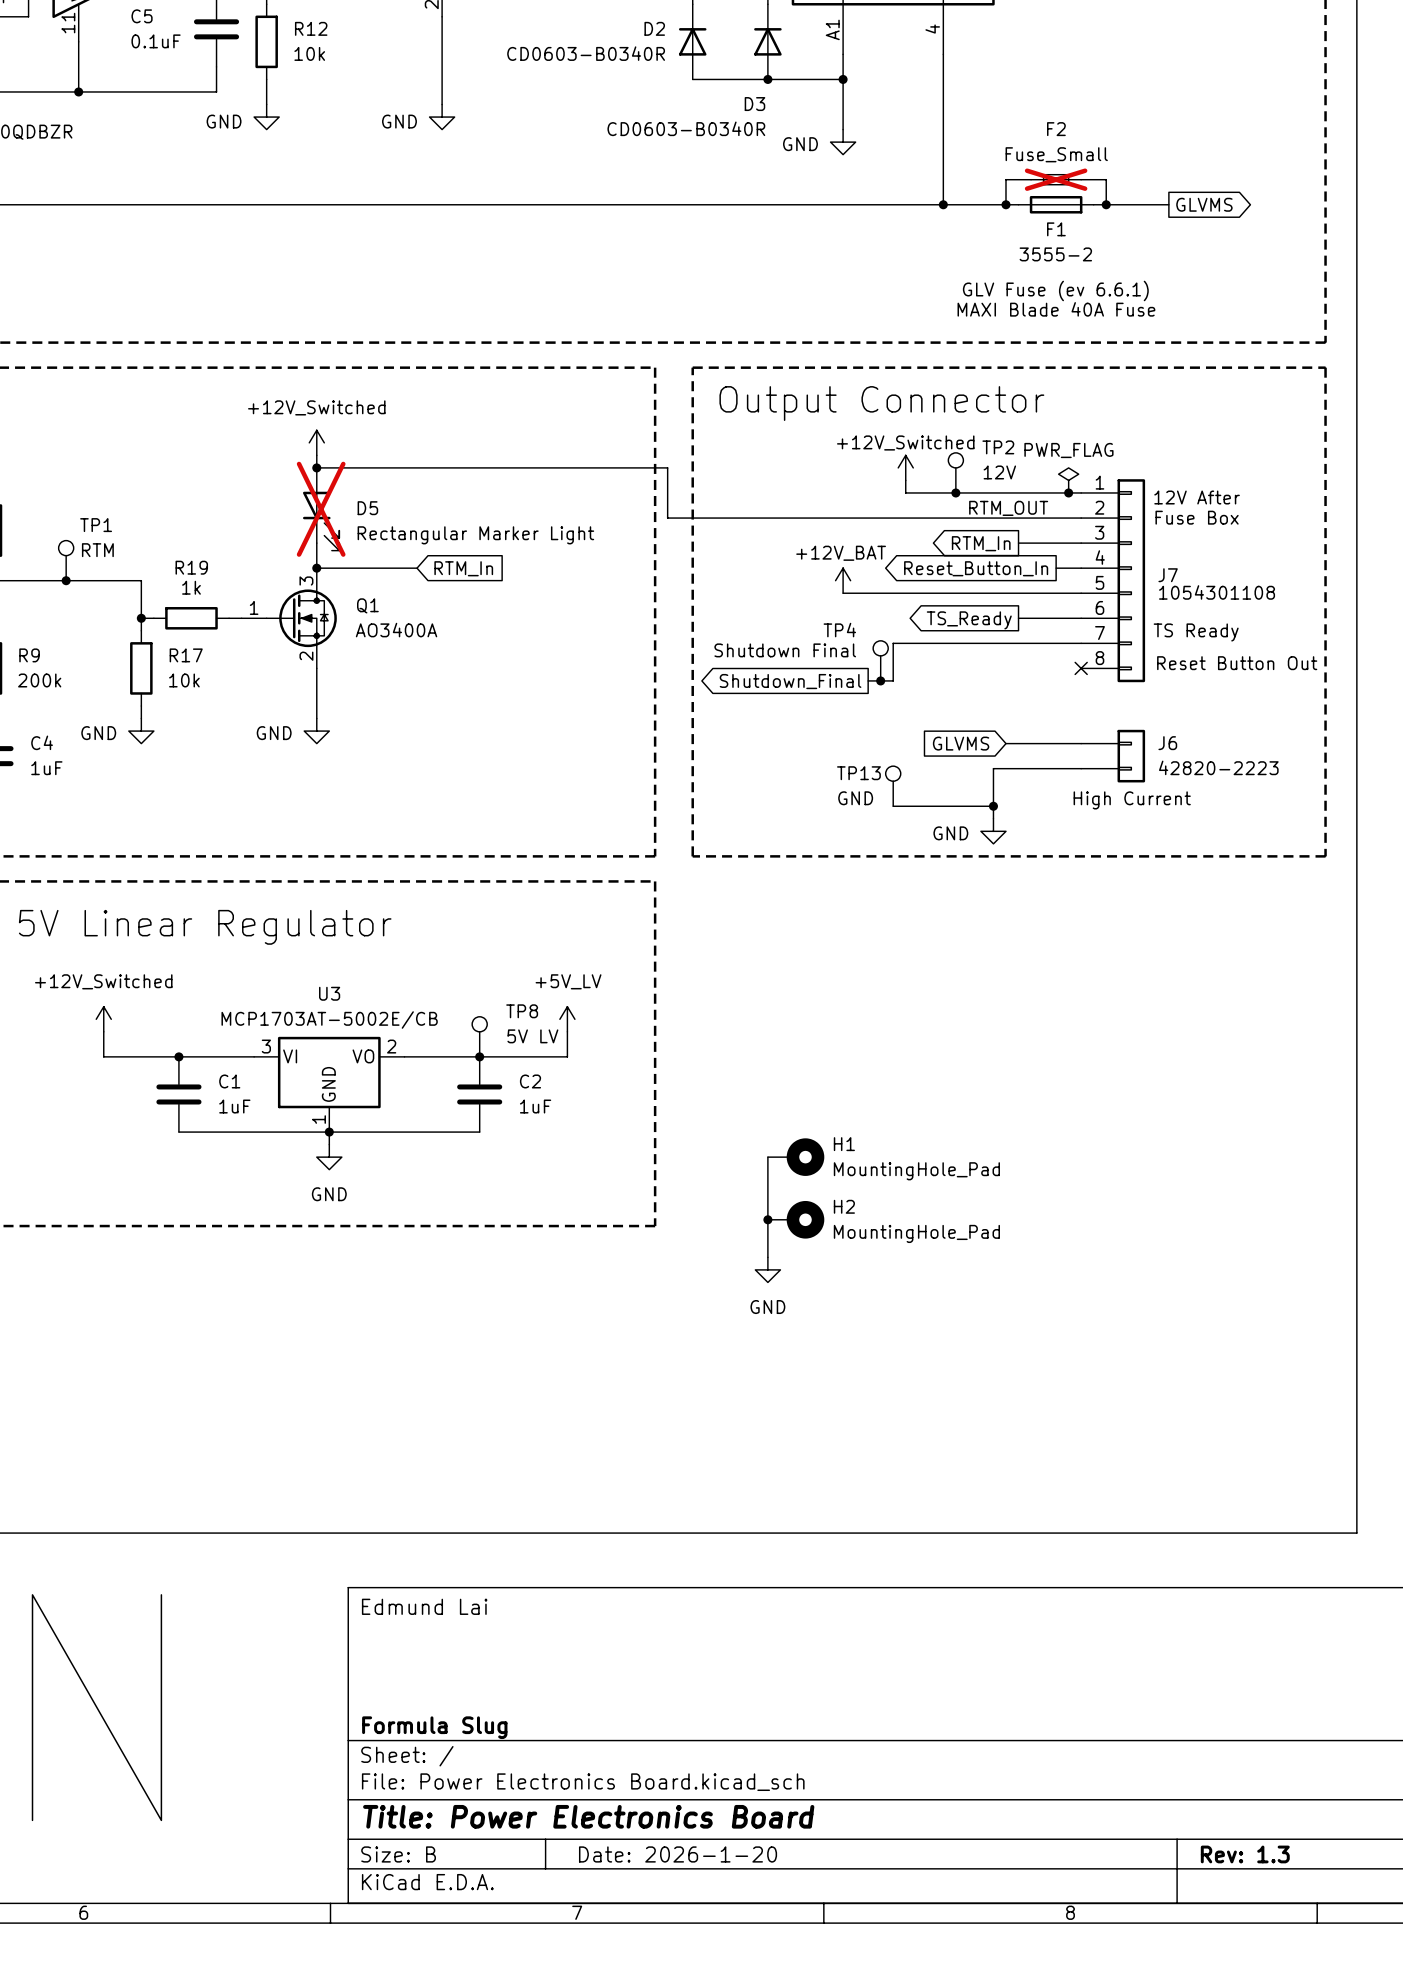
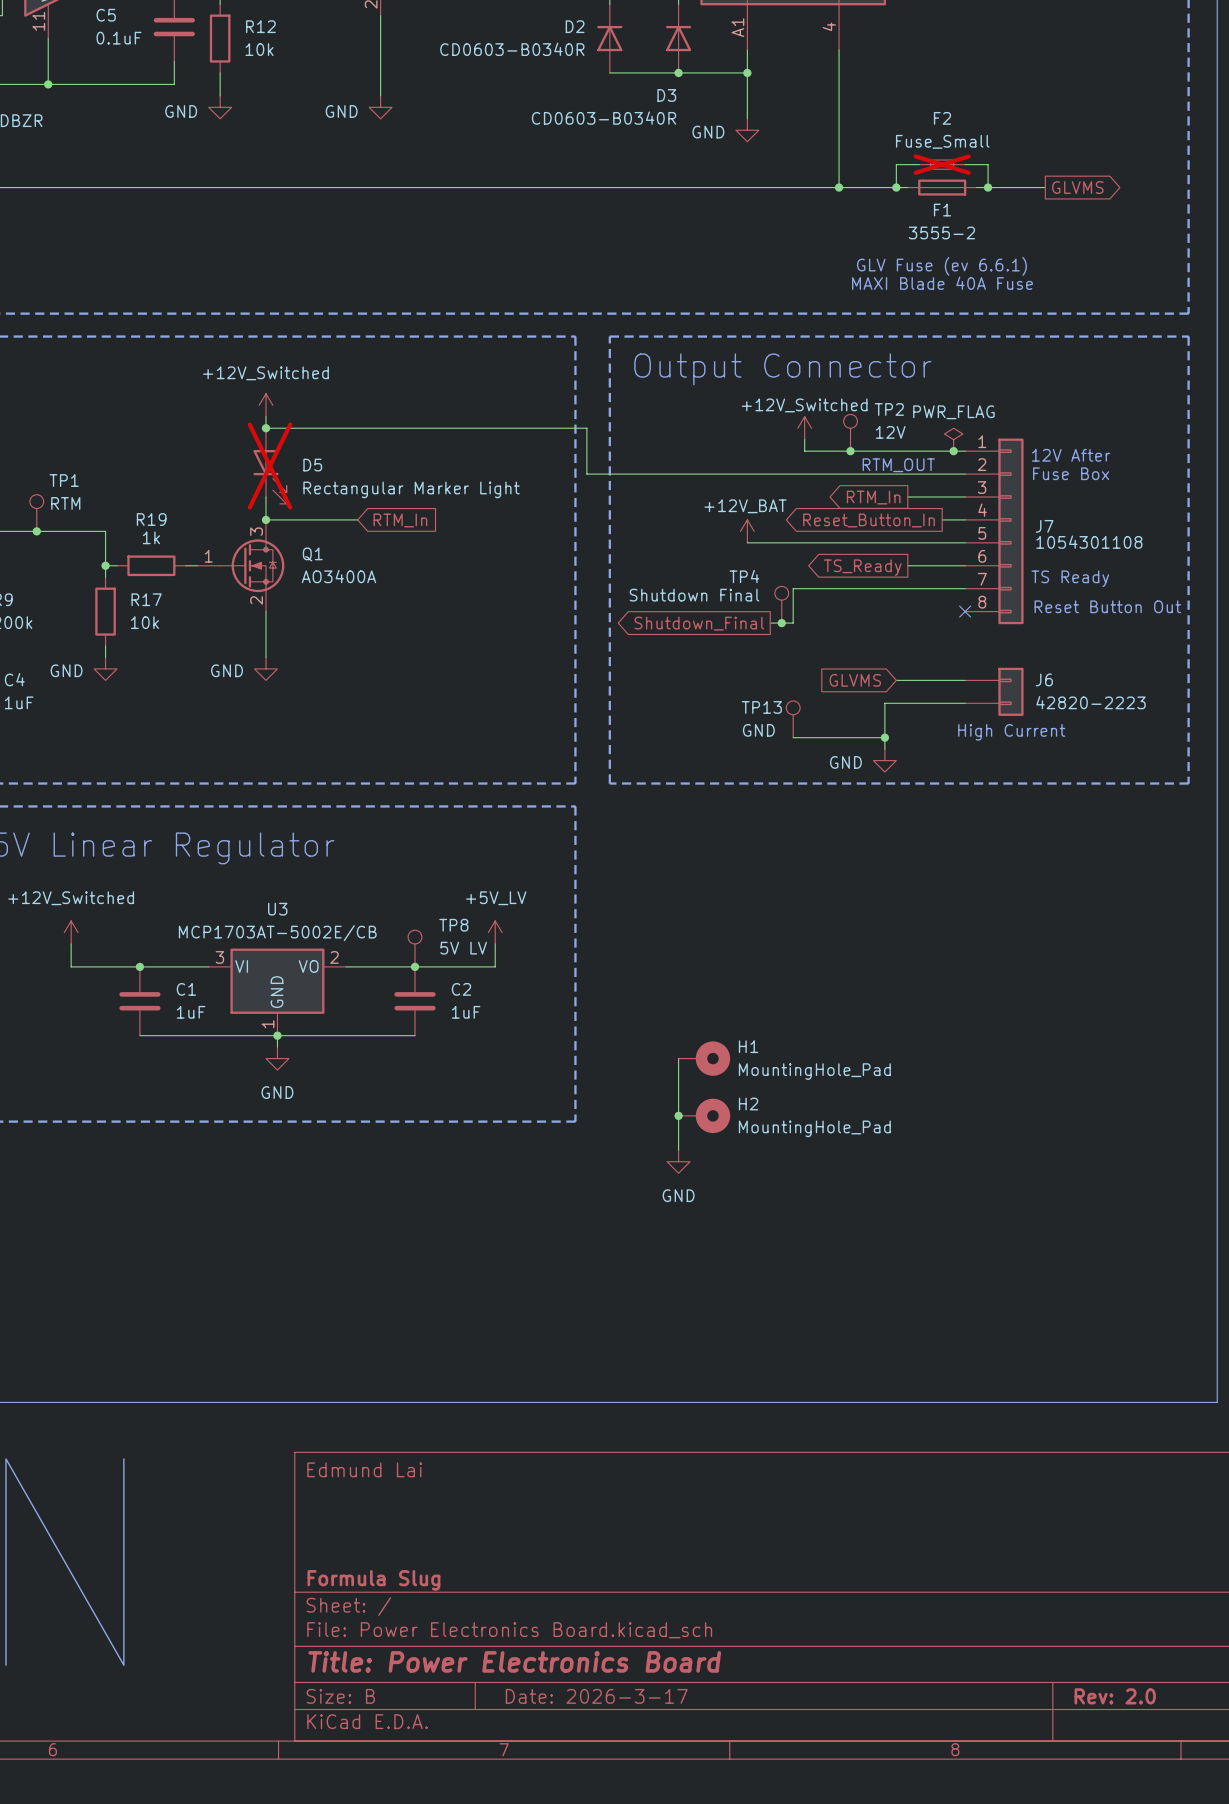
title block: Date: 2026-1-20 (678, 1854) -> Date: 2026-3-17 (596, 1696)
title block: Rev: 1.3 (1245, 1854) -> Rev: 2.0 (1115, 1696)

